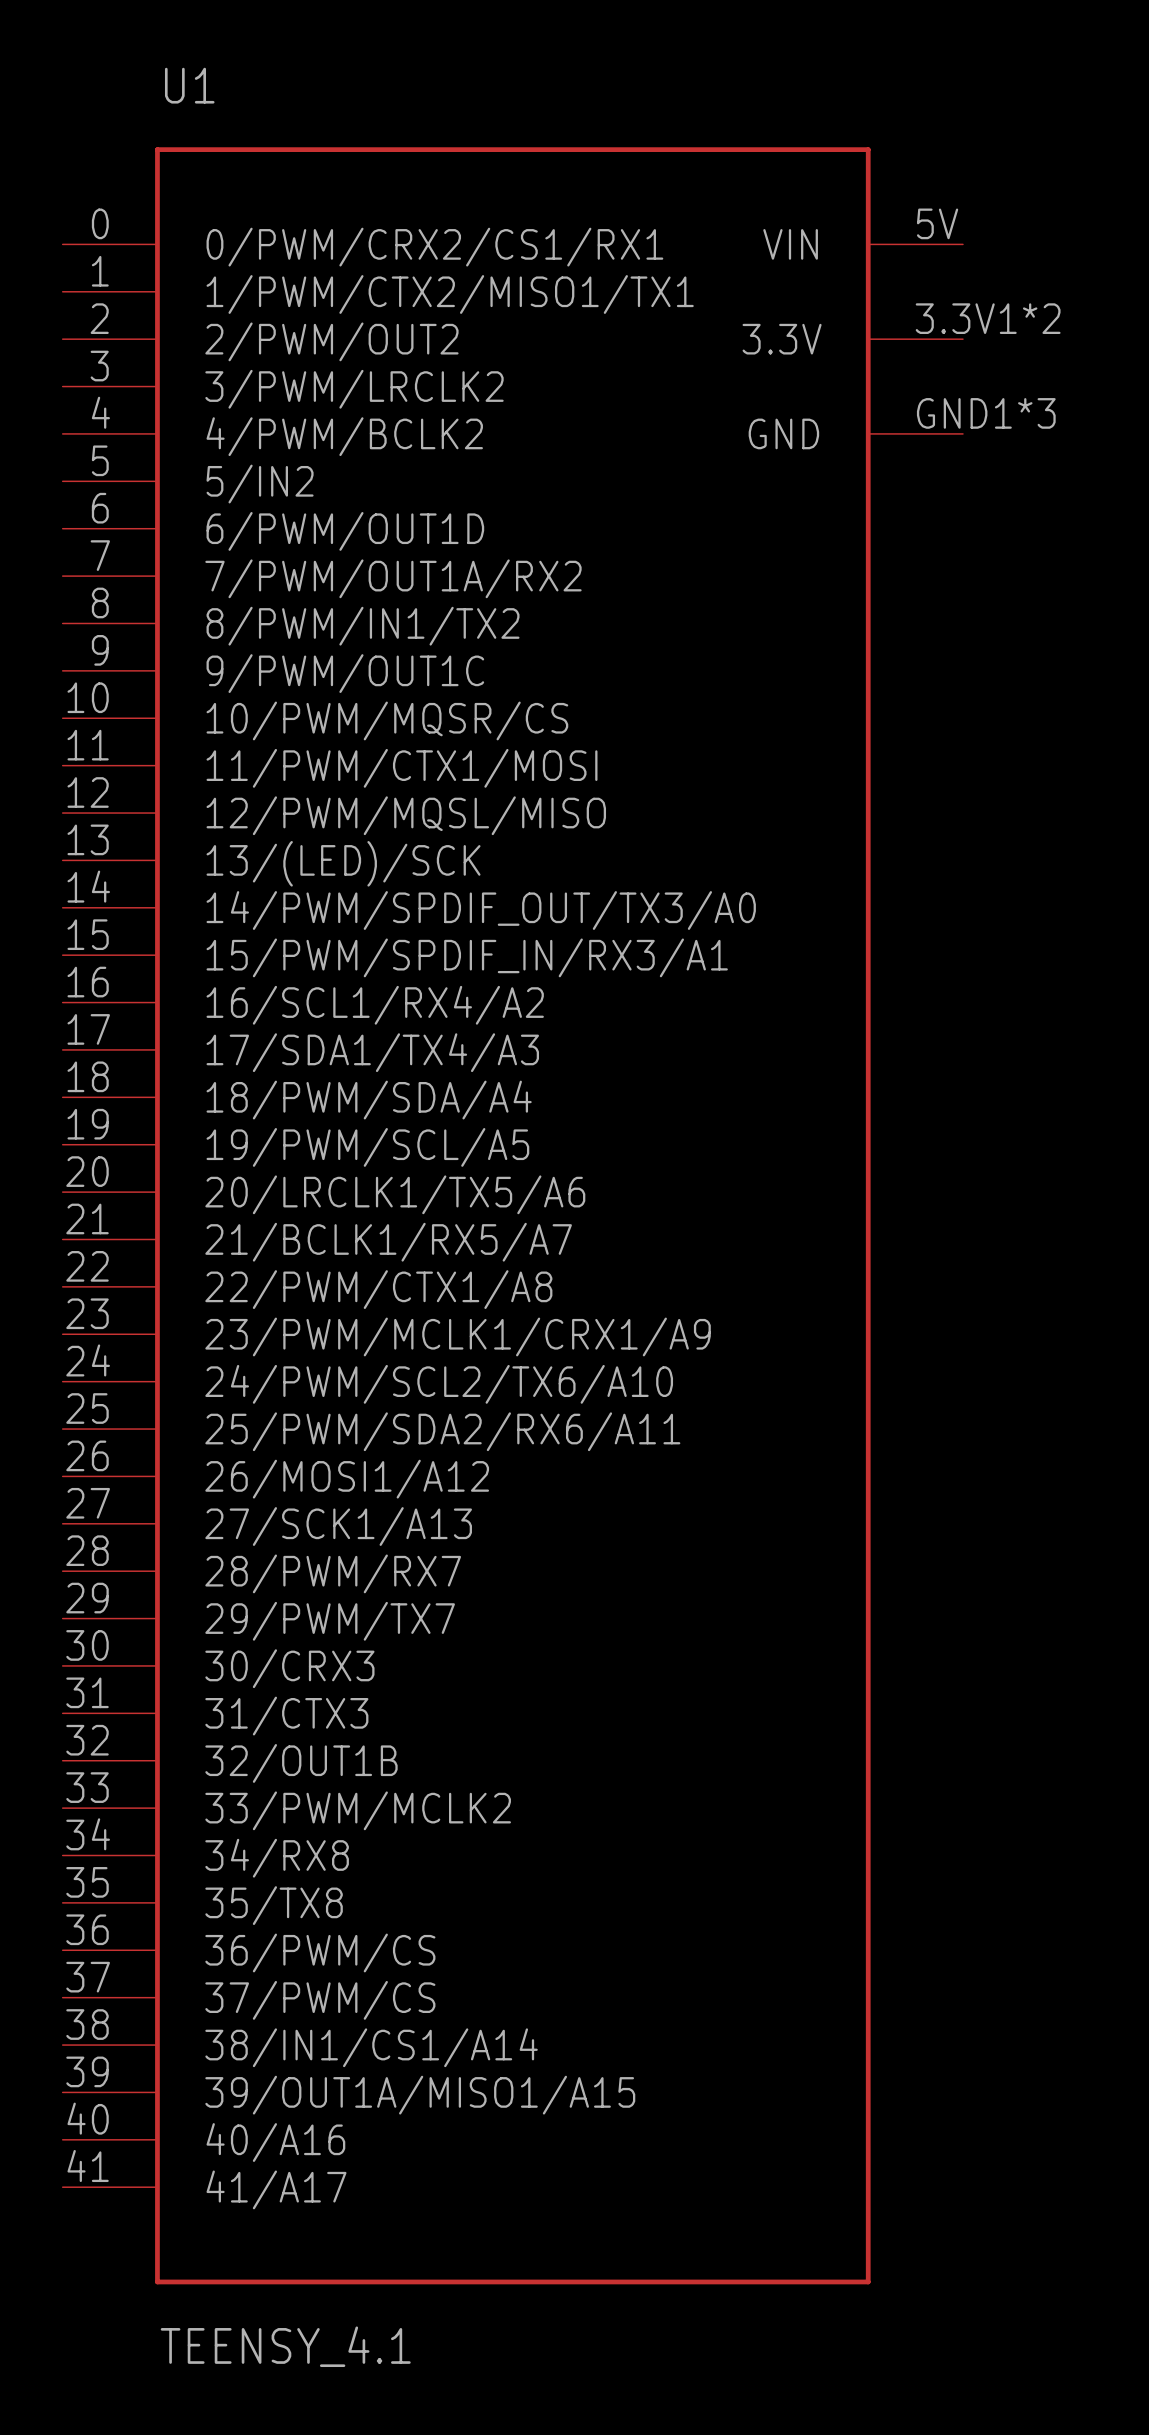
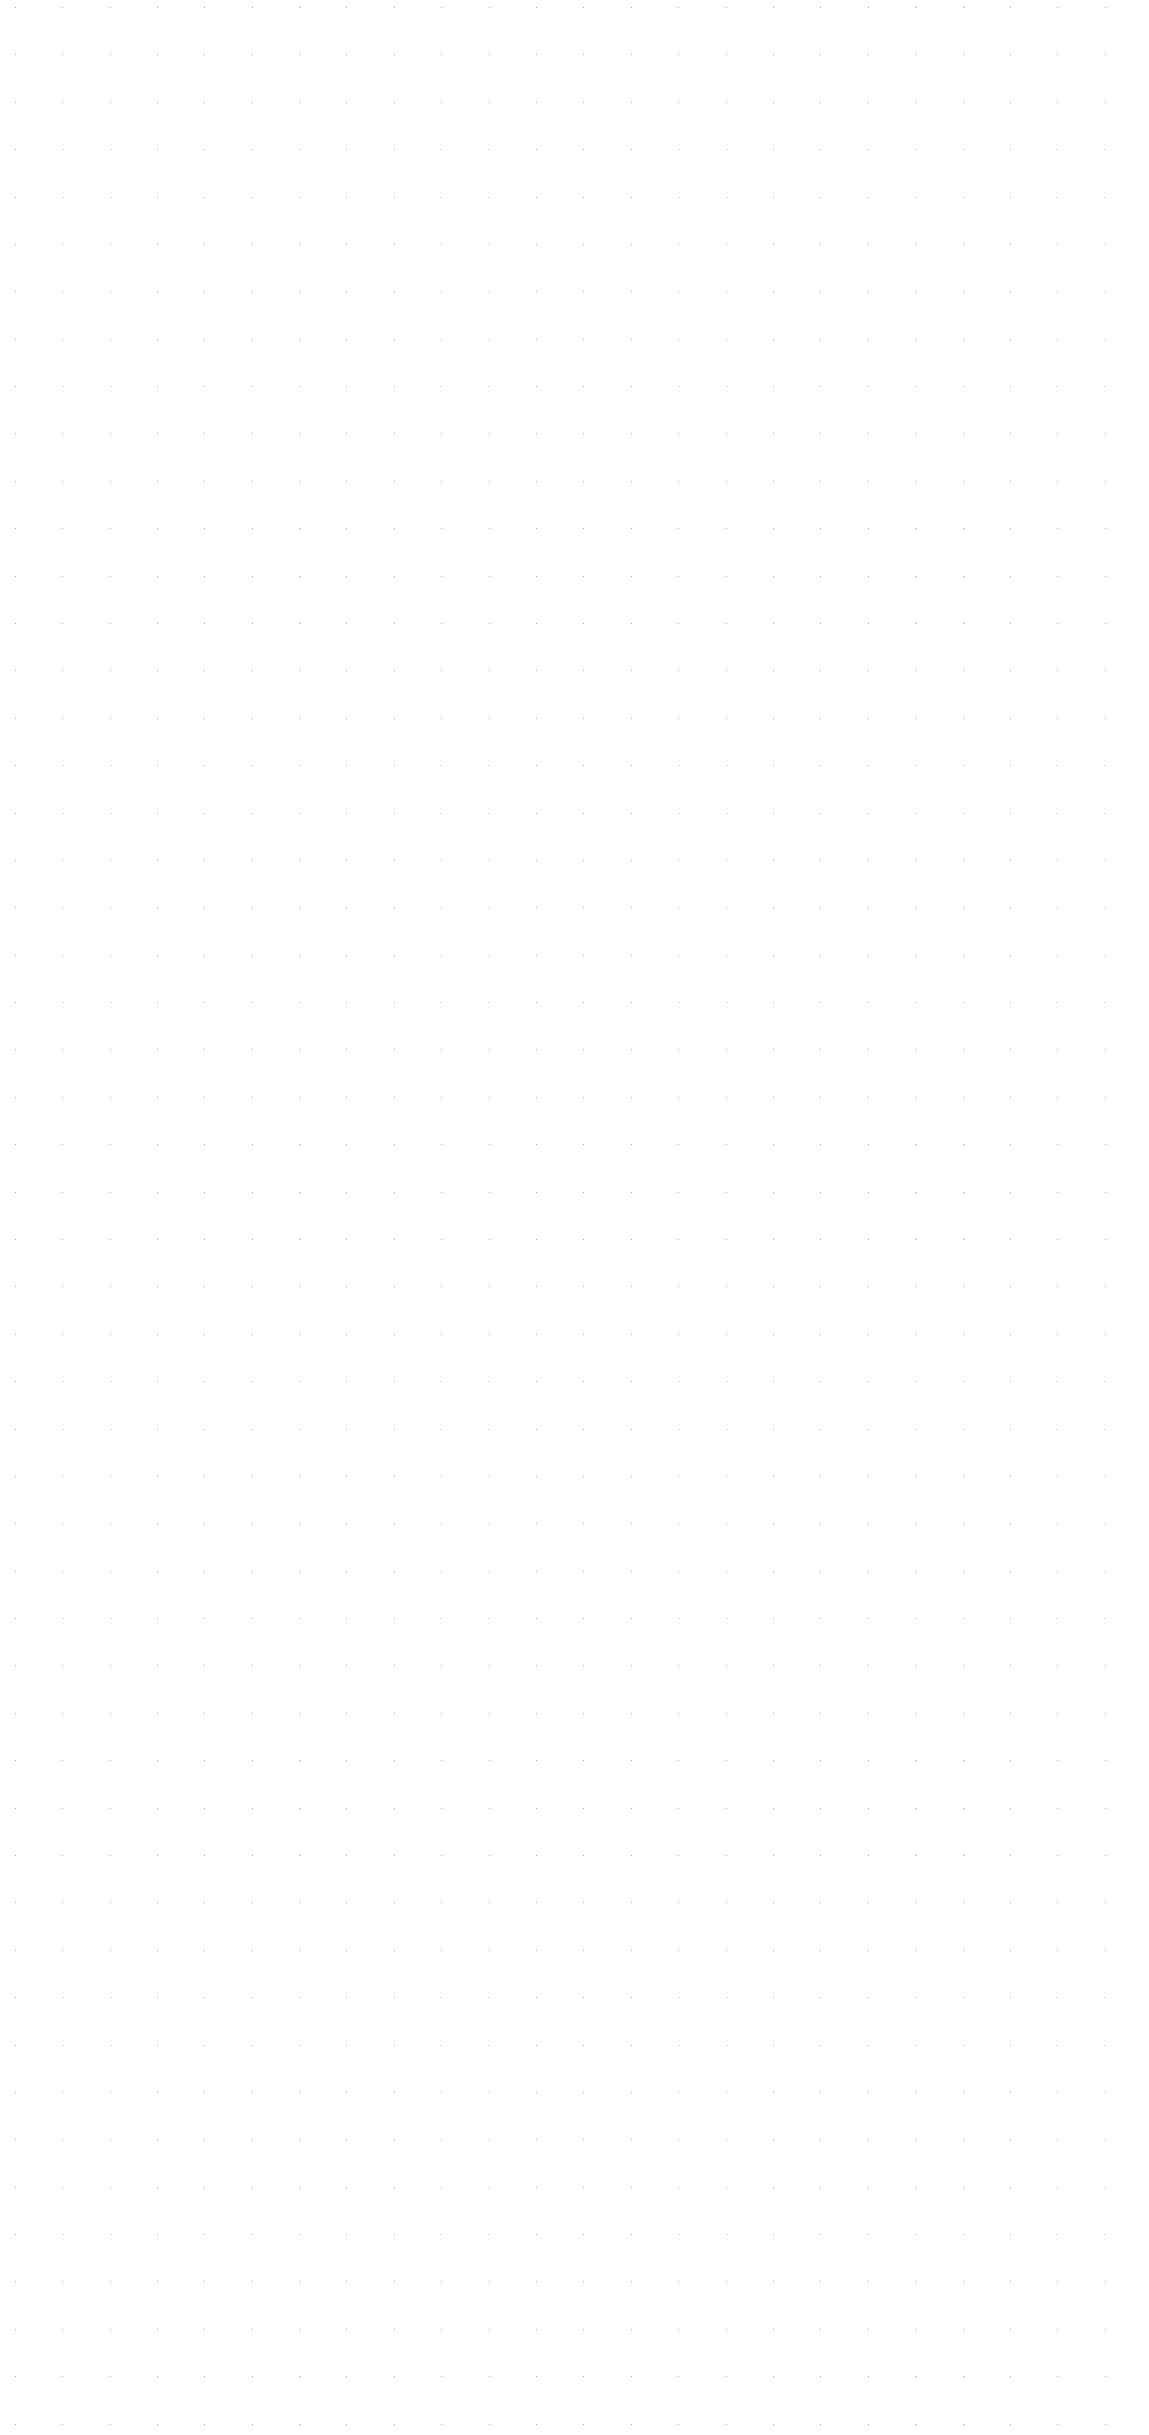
U1: TEENSY_4.1 (512, 1215) -> none

